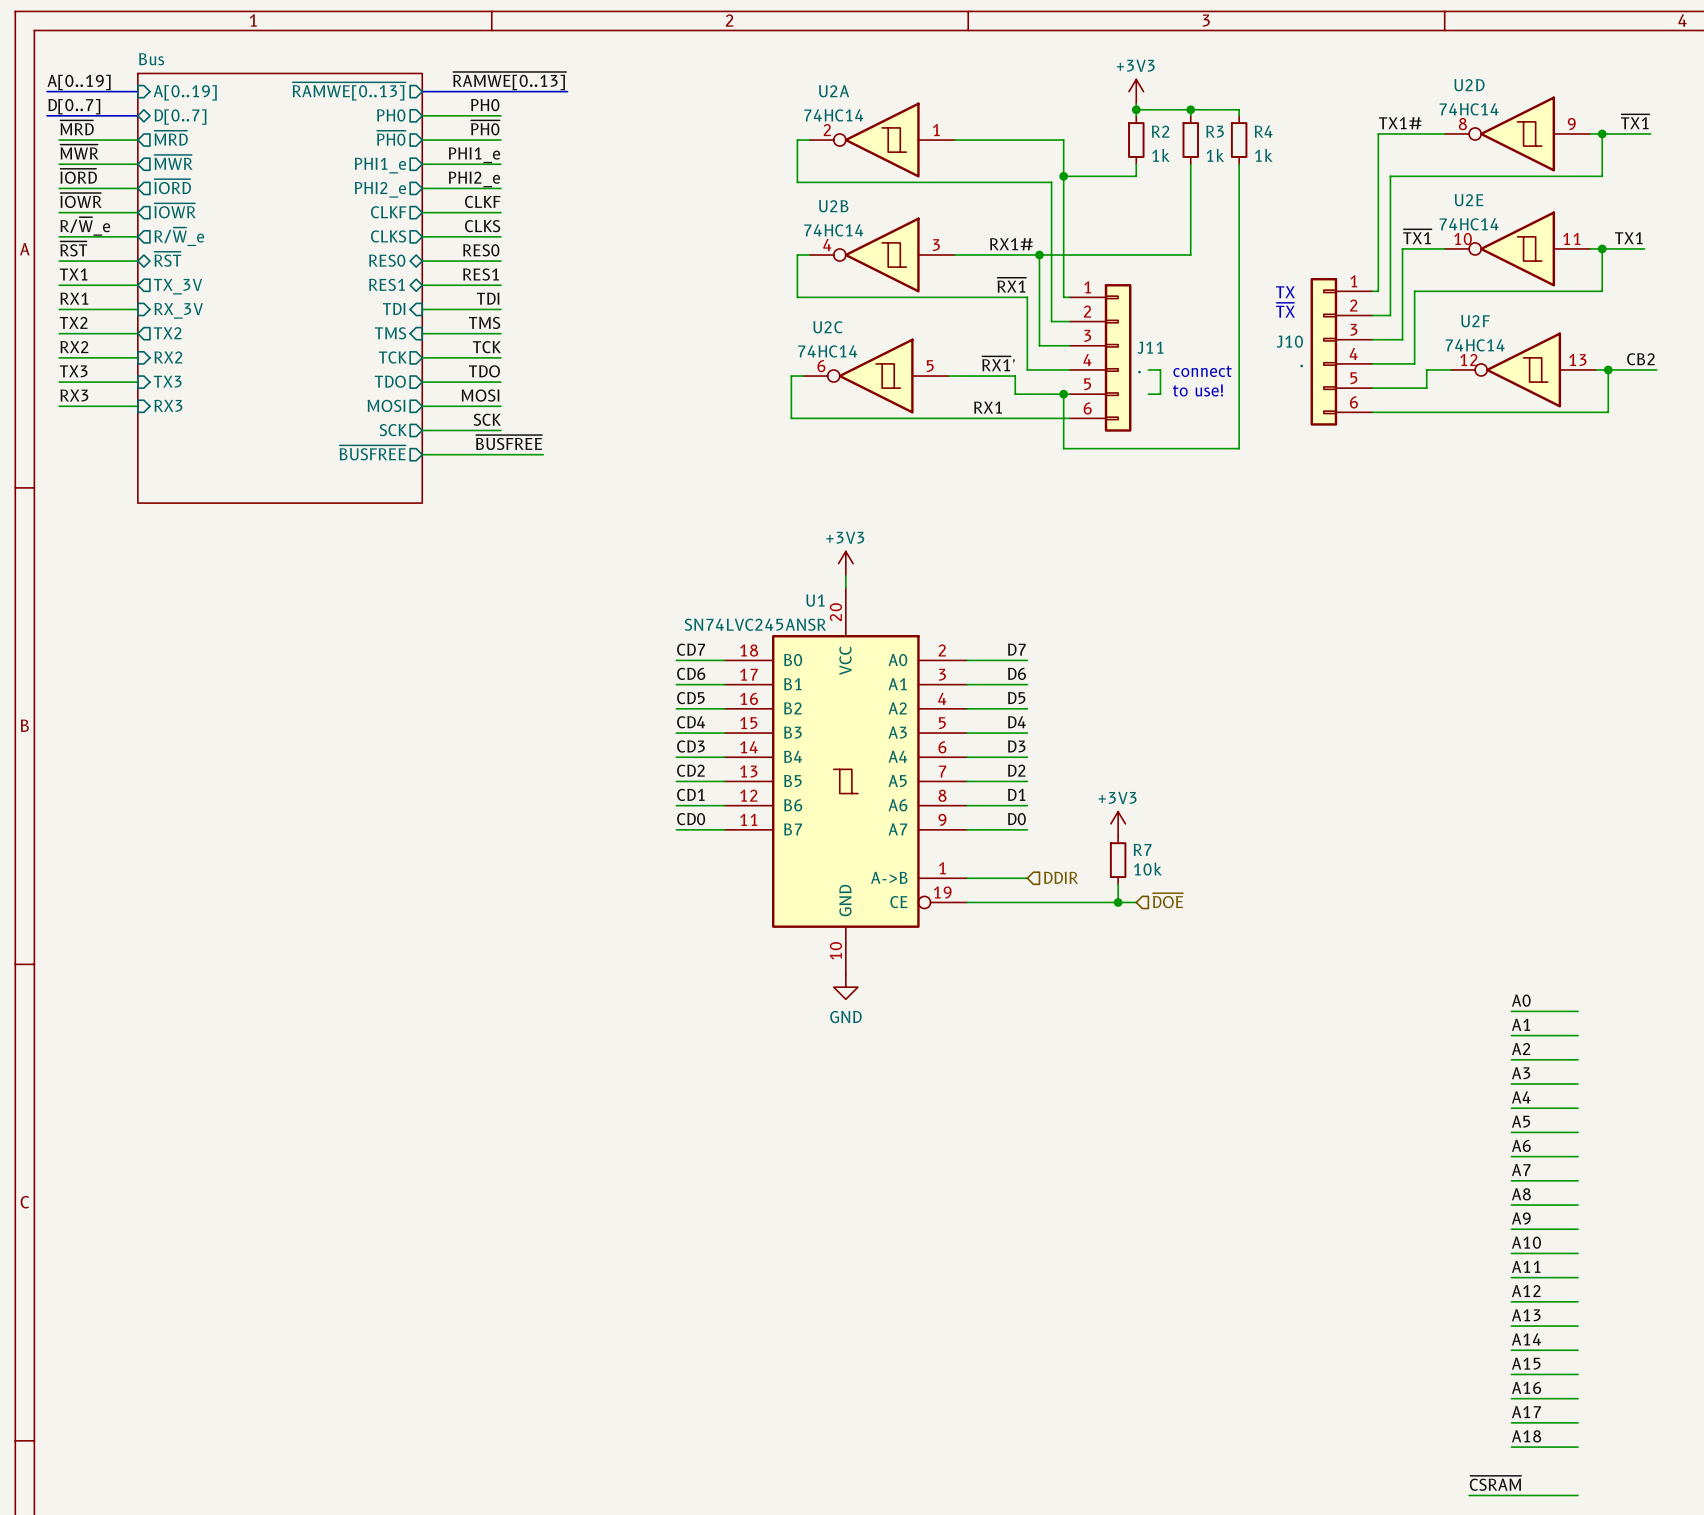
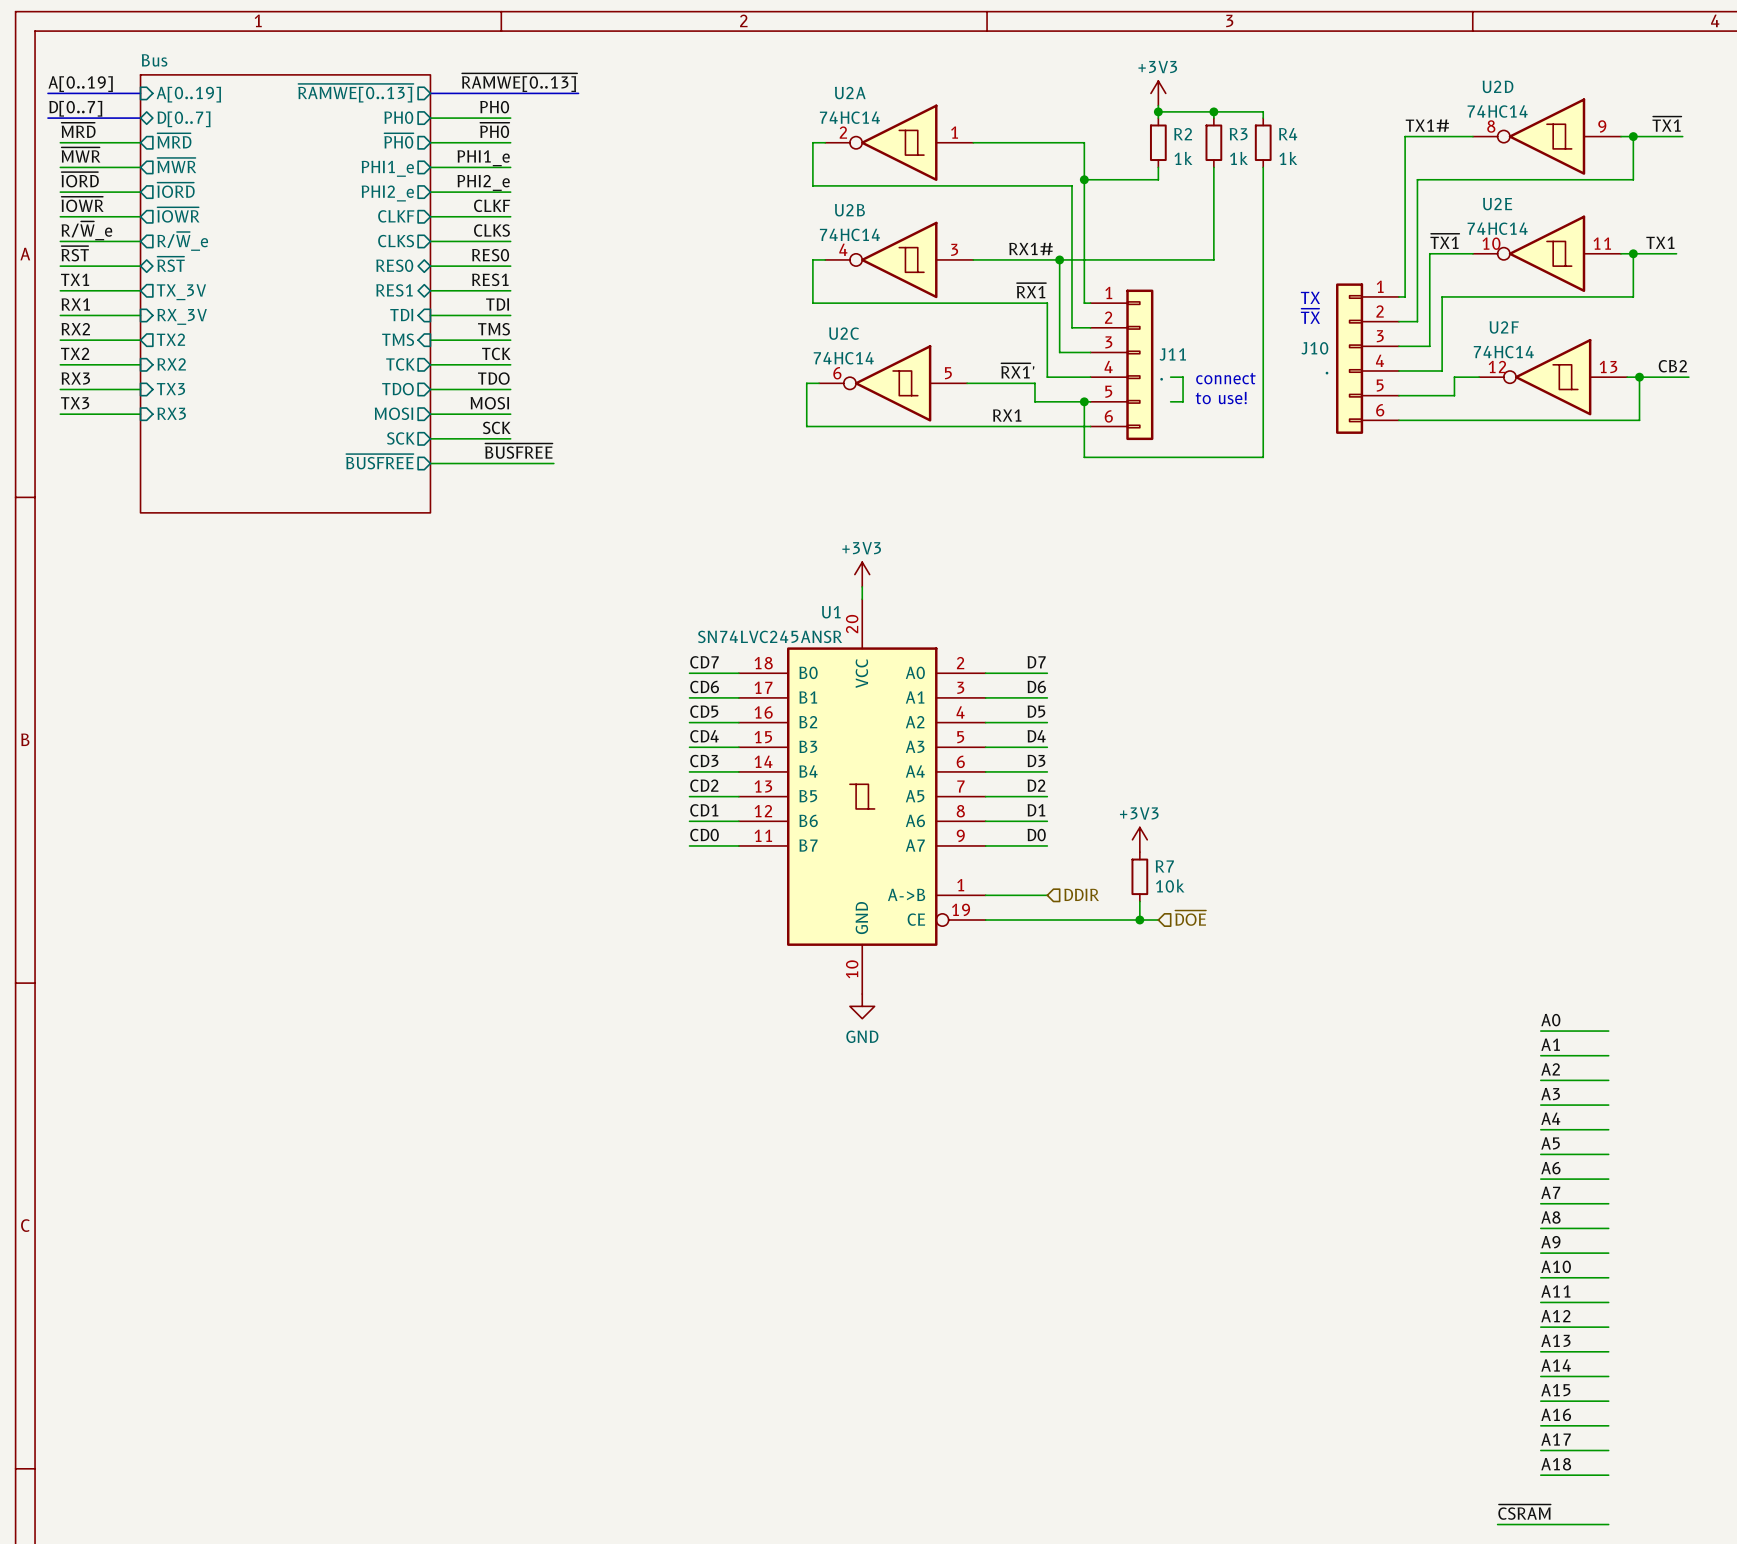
label: TX2 (73, 322) -> RX2 (75, 329)
label: RX2 (74, 347) -> TX2 (75, 353)
label: TX3 (73, 371) -> RX3 (75, 378)
label: RX3 (74, 395) -> TX3 (75, 403)

